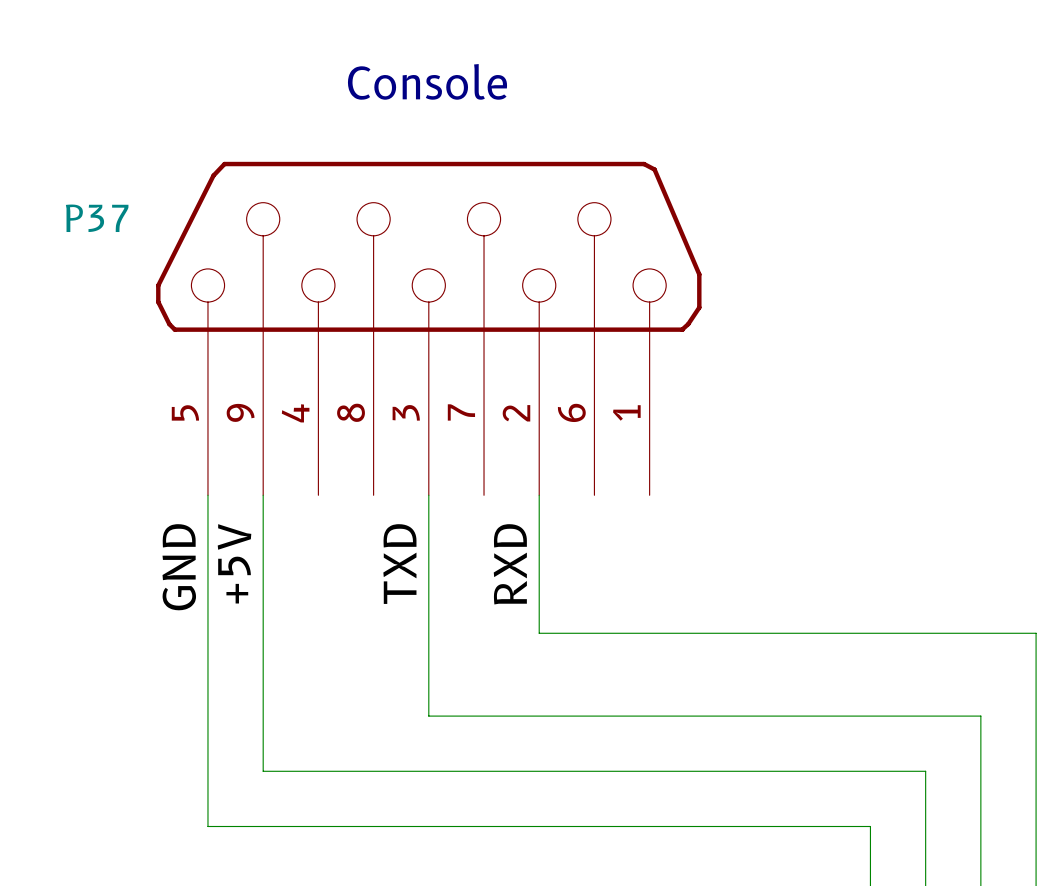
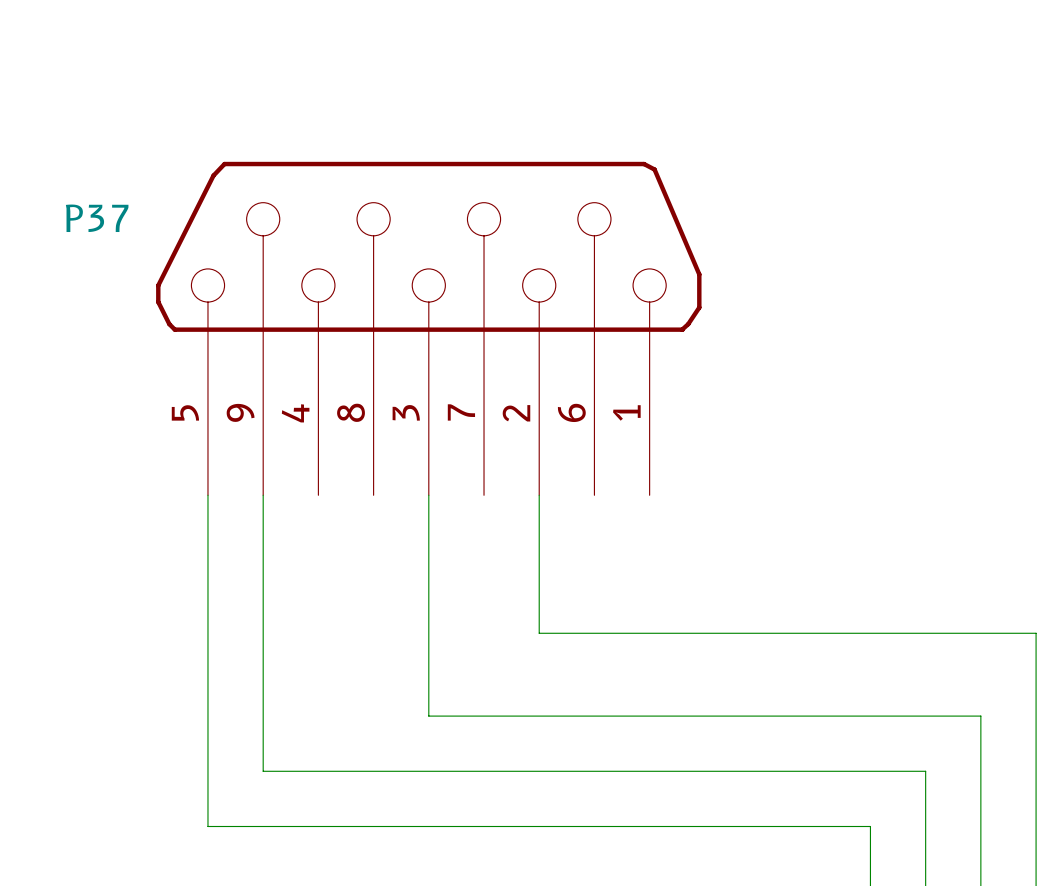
text: Console (427, 81) -> none
label: +5V (234, 563) -> none
label: TXD (399, 564) -> none
label: RXD (510, 564) -> none
label: GND (179, 567) -> none

